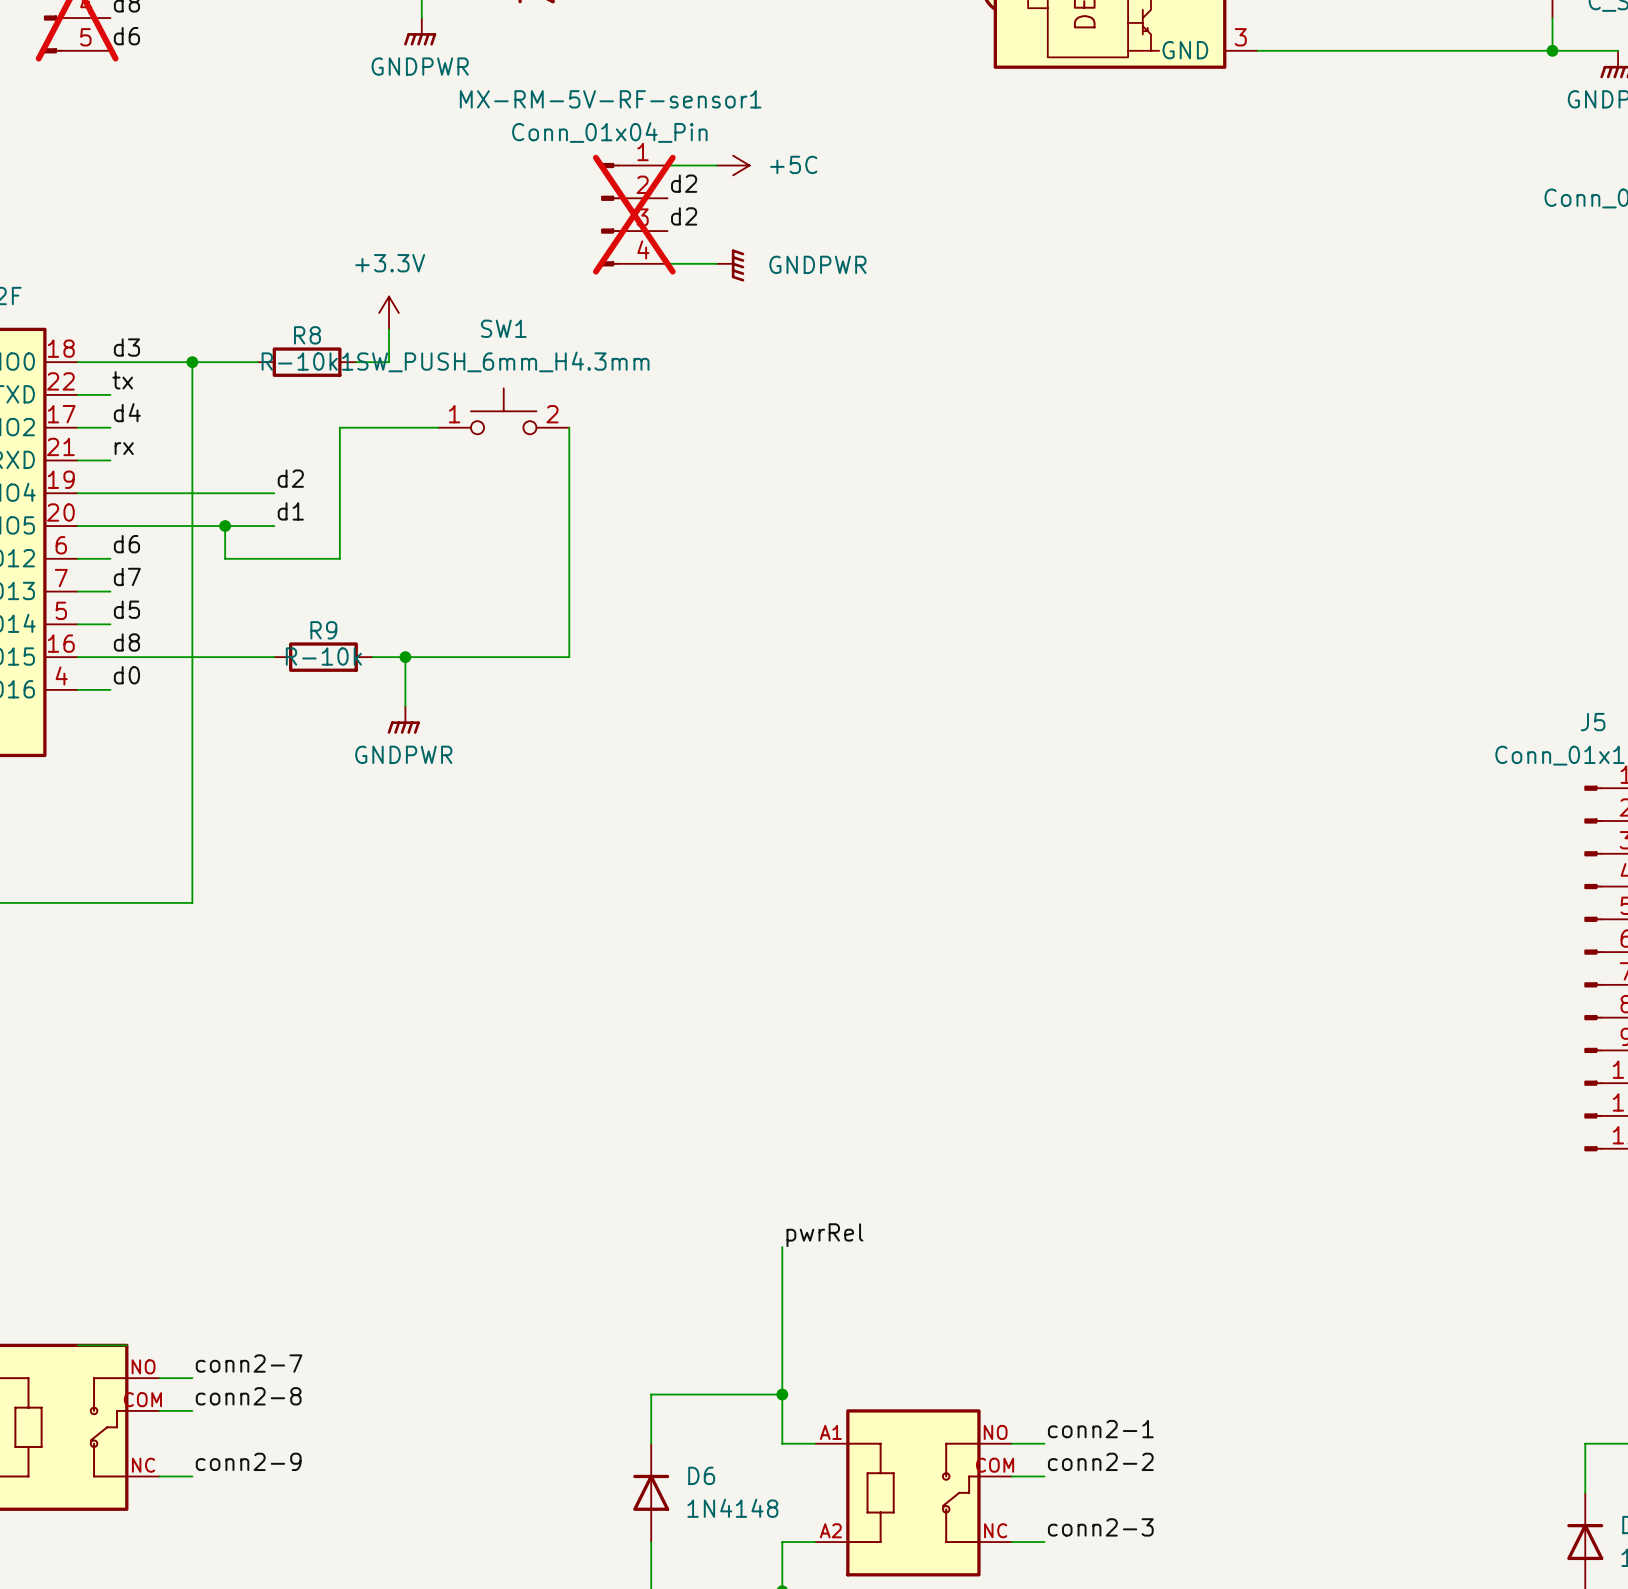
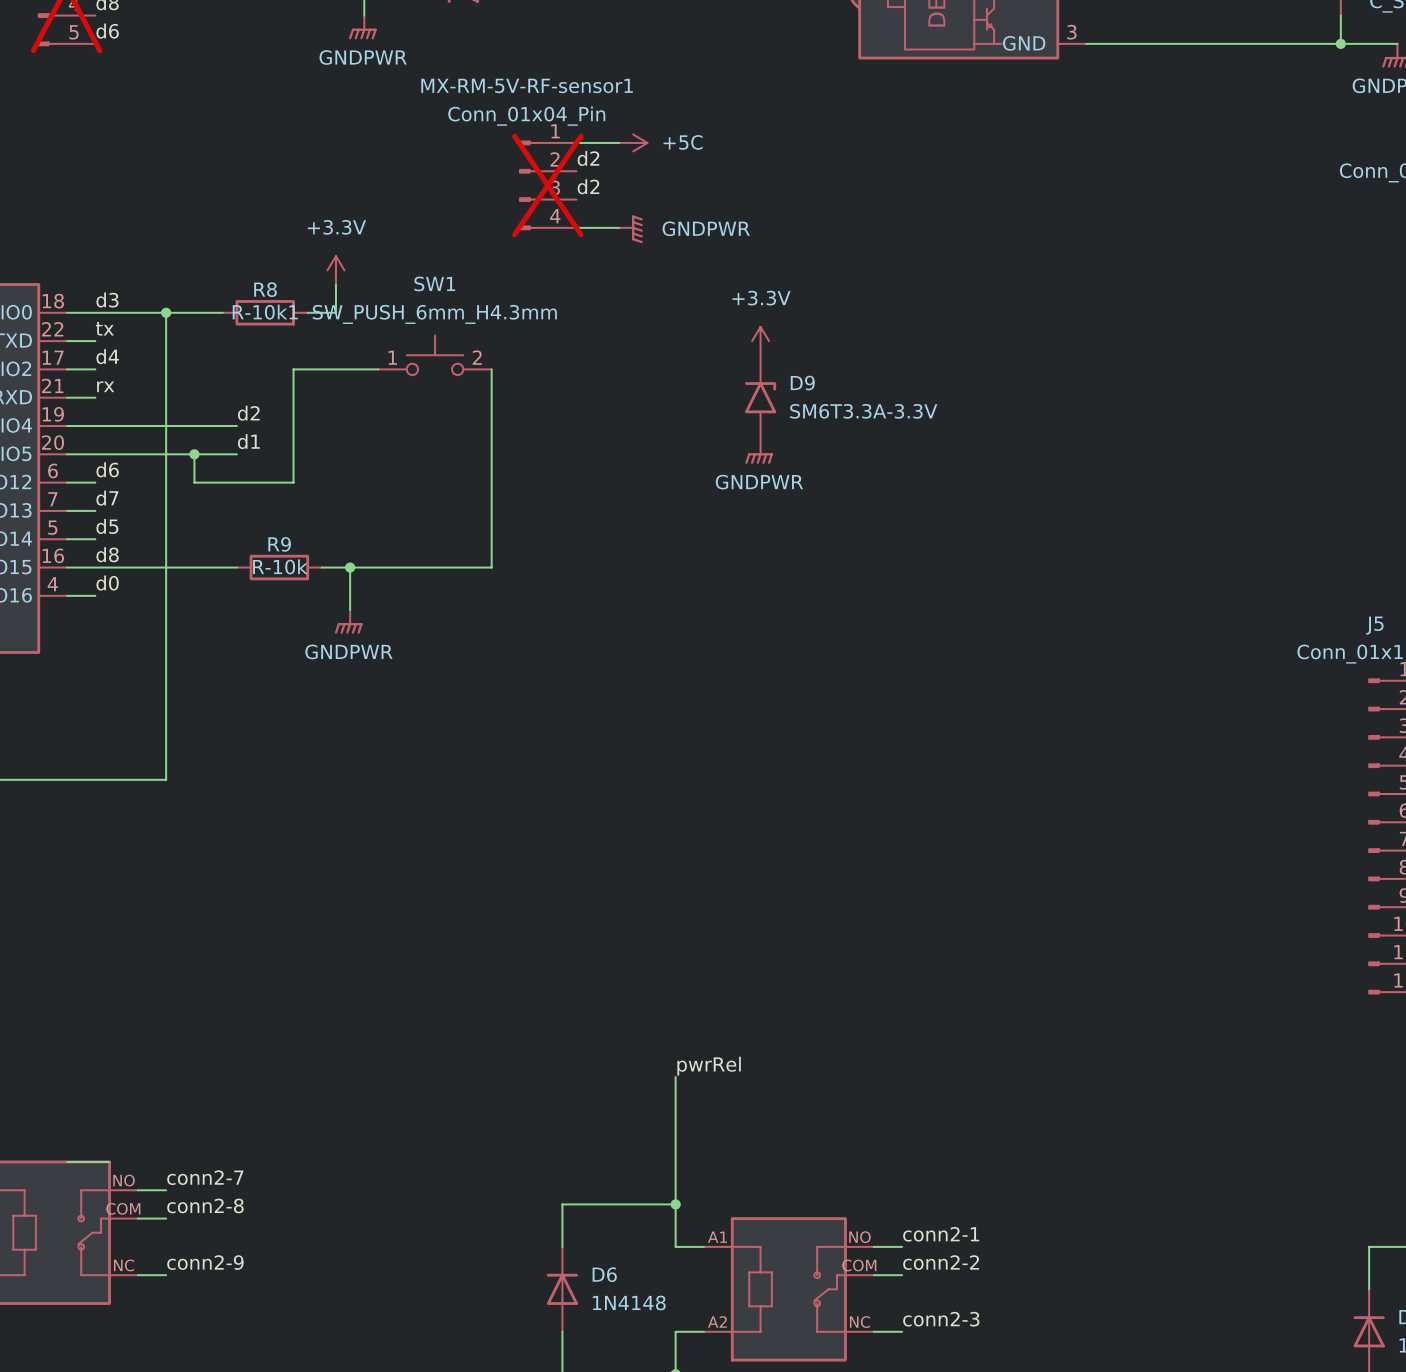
power symbol: none -> +3.3V (760, 341)
D9: none -> SM6T3.3A-3.3V (760, 397)
power symbol: none -> GNDPWR (759, 452)

